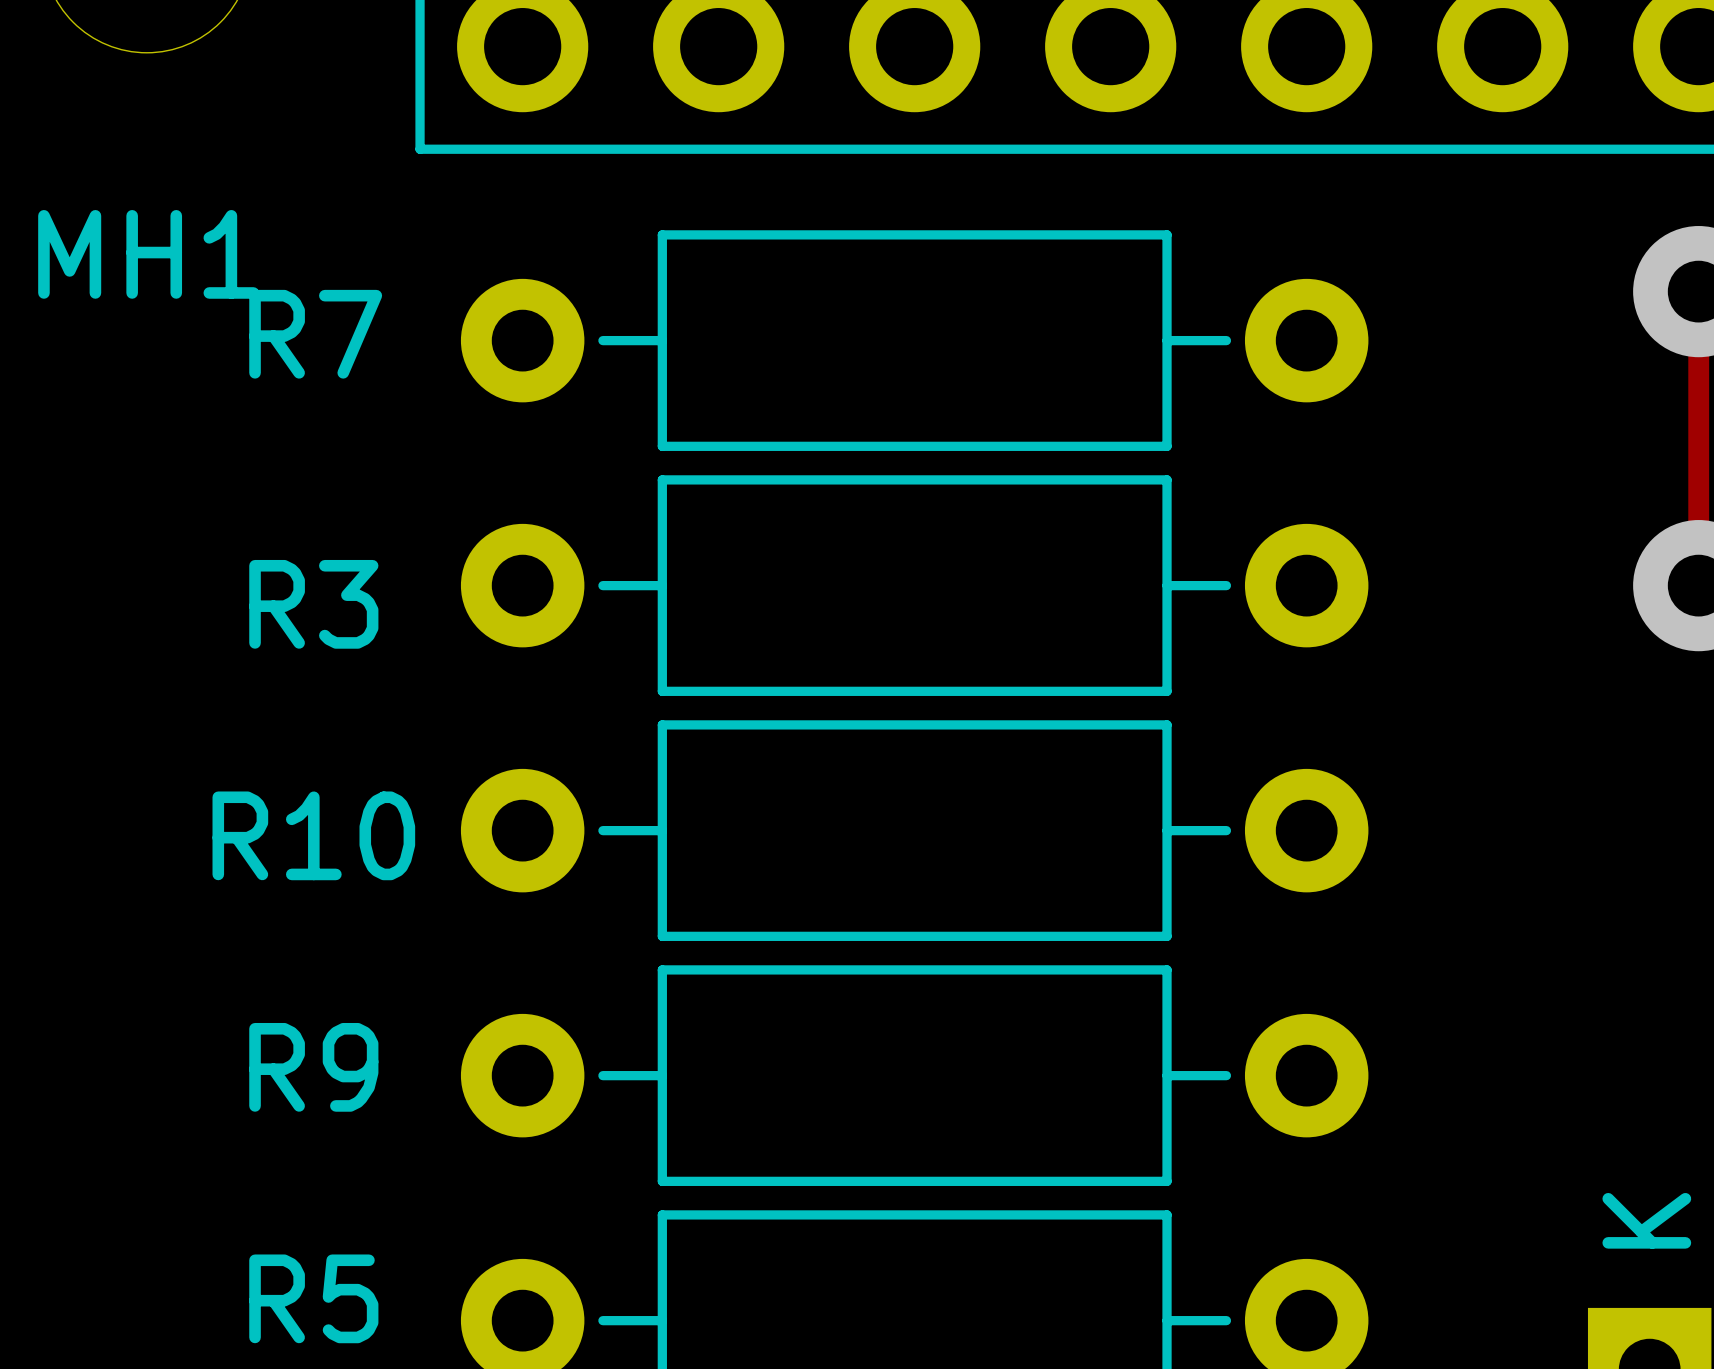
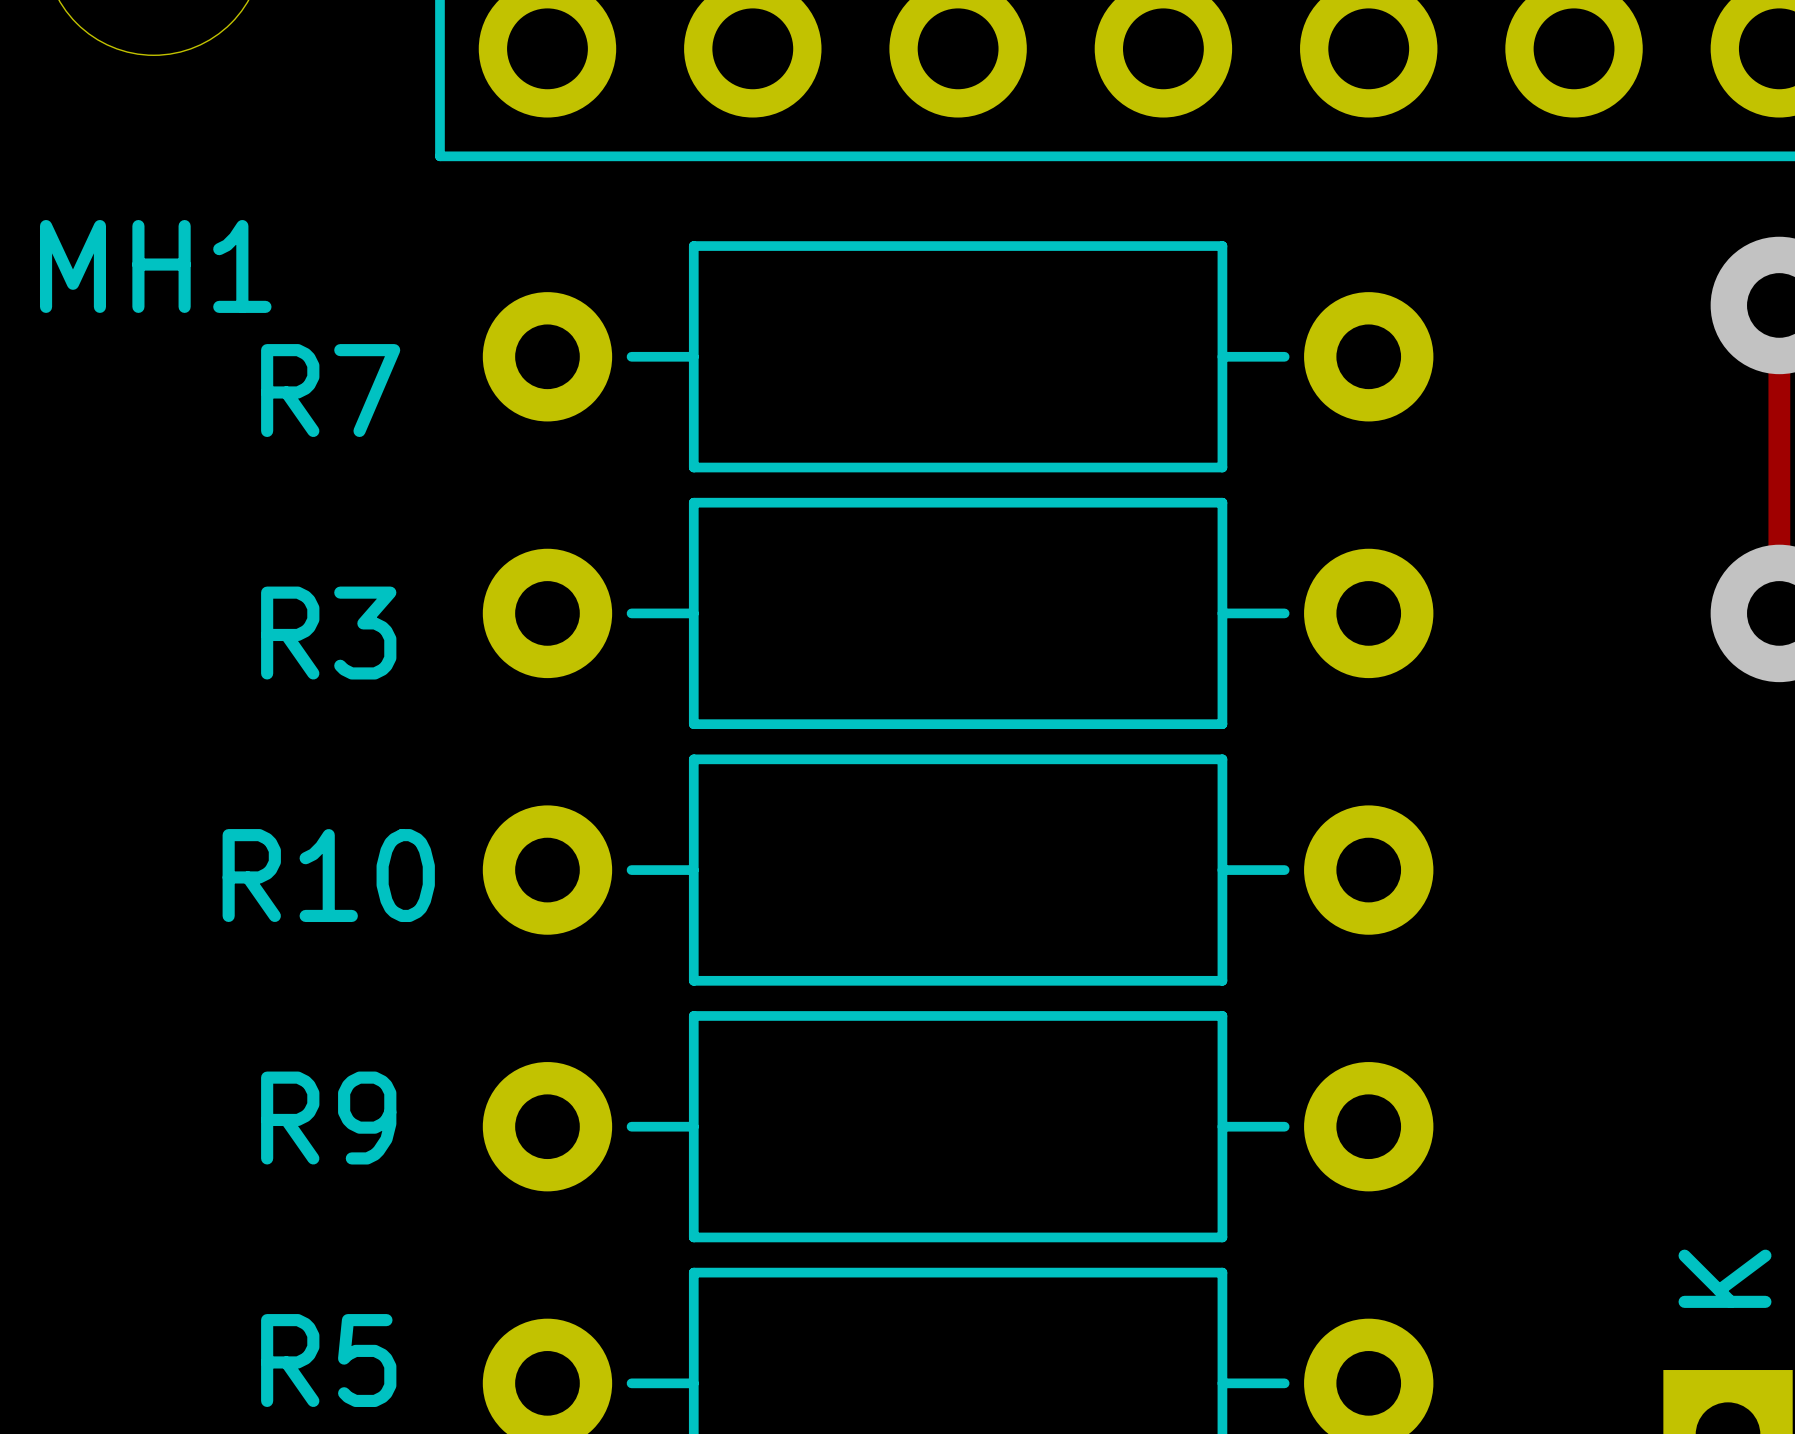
R7 name position: R7 (315, 334) -> R7 (330, 390)

